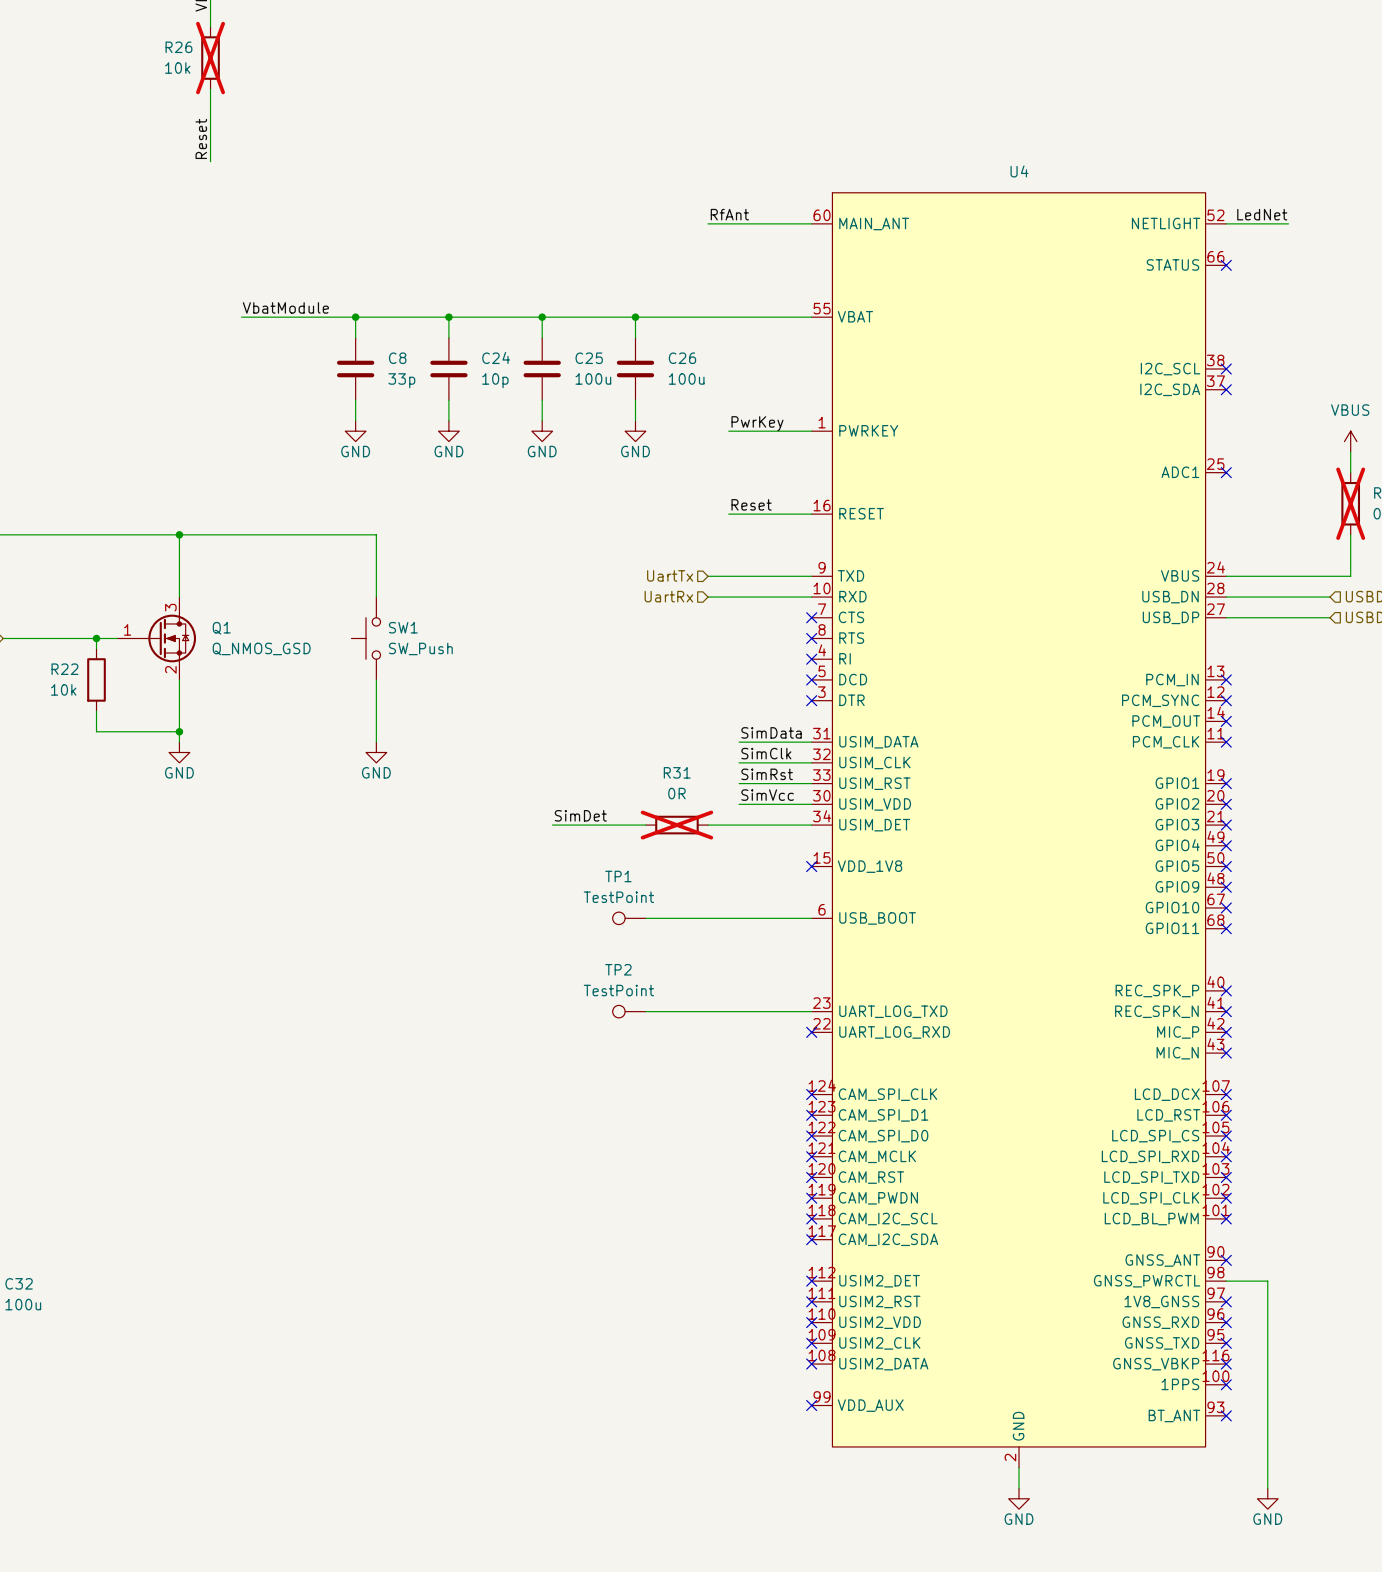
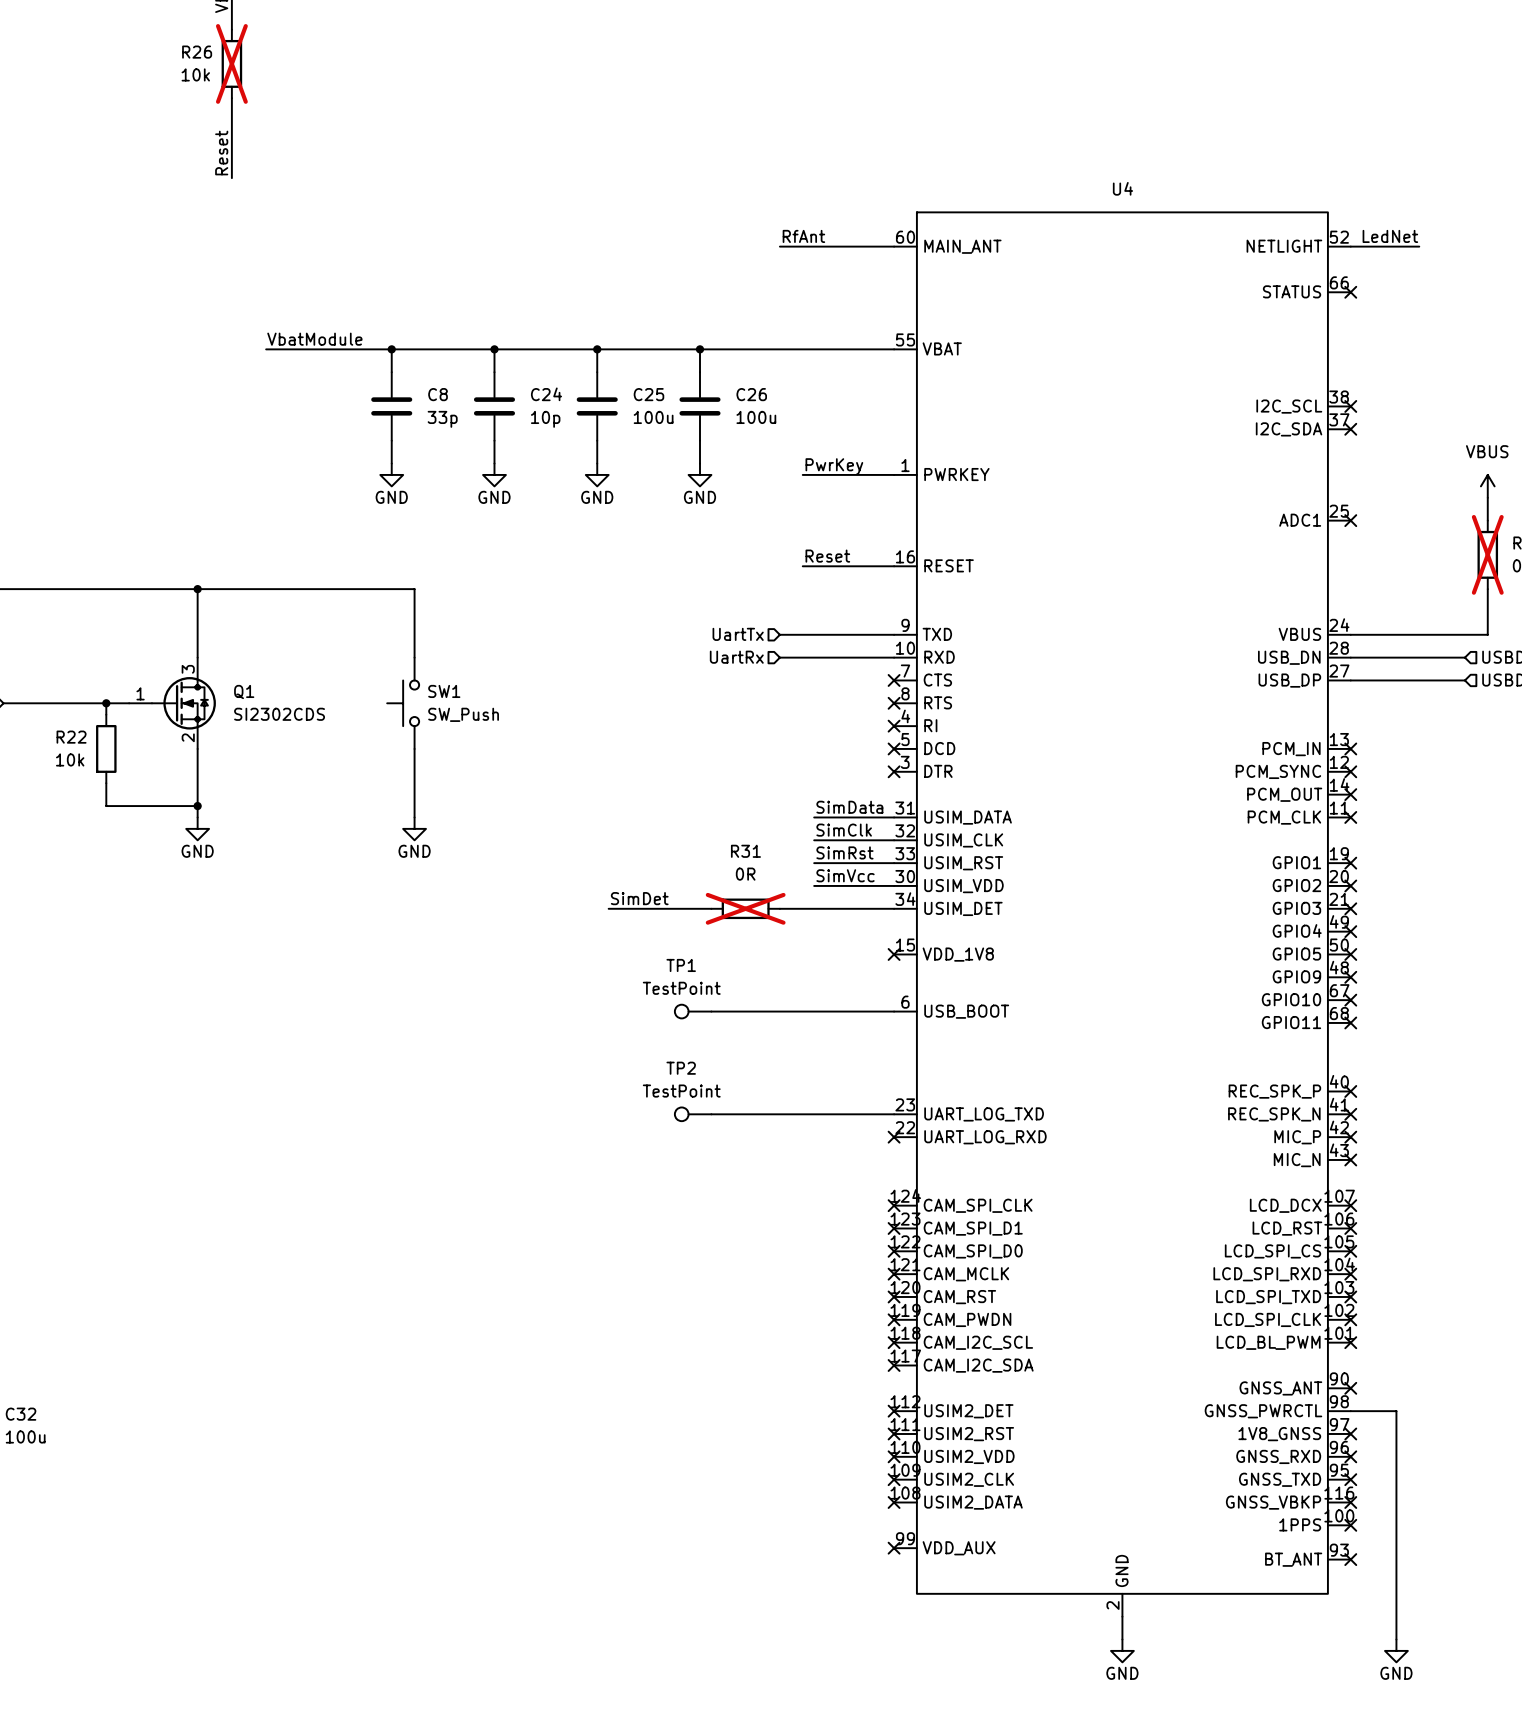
Q1 value: Q_NMOS_GSD (261, 648) -> SI2302CDS (279, 714)

